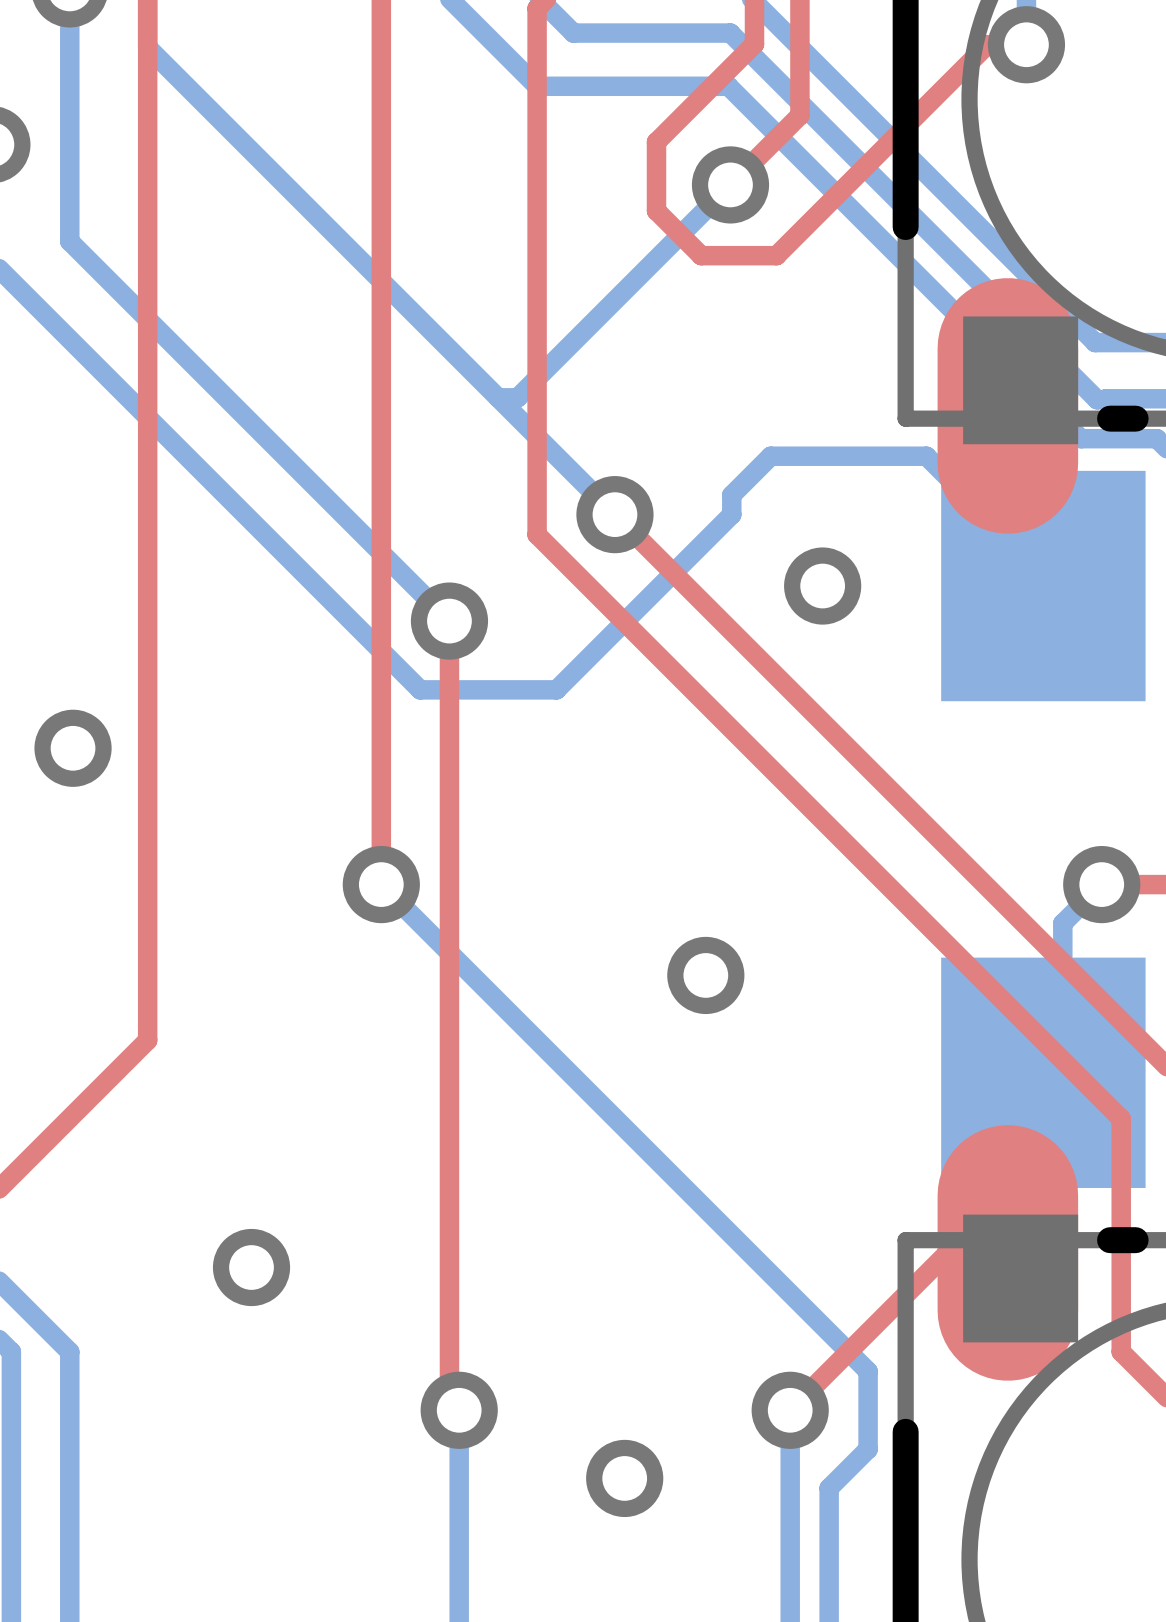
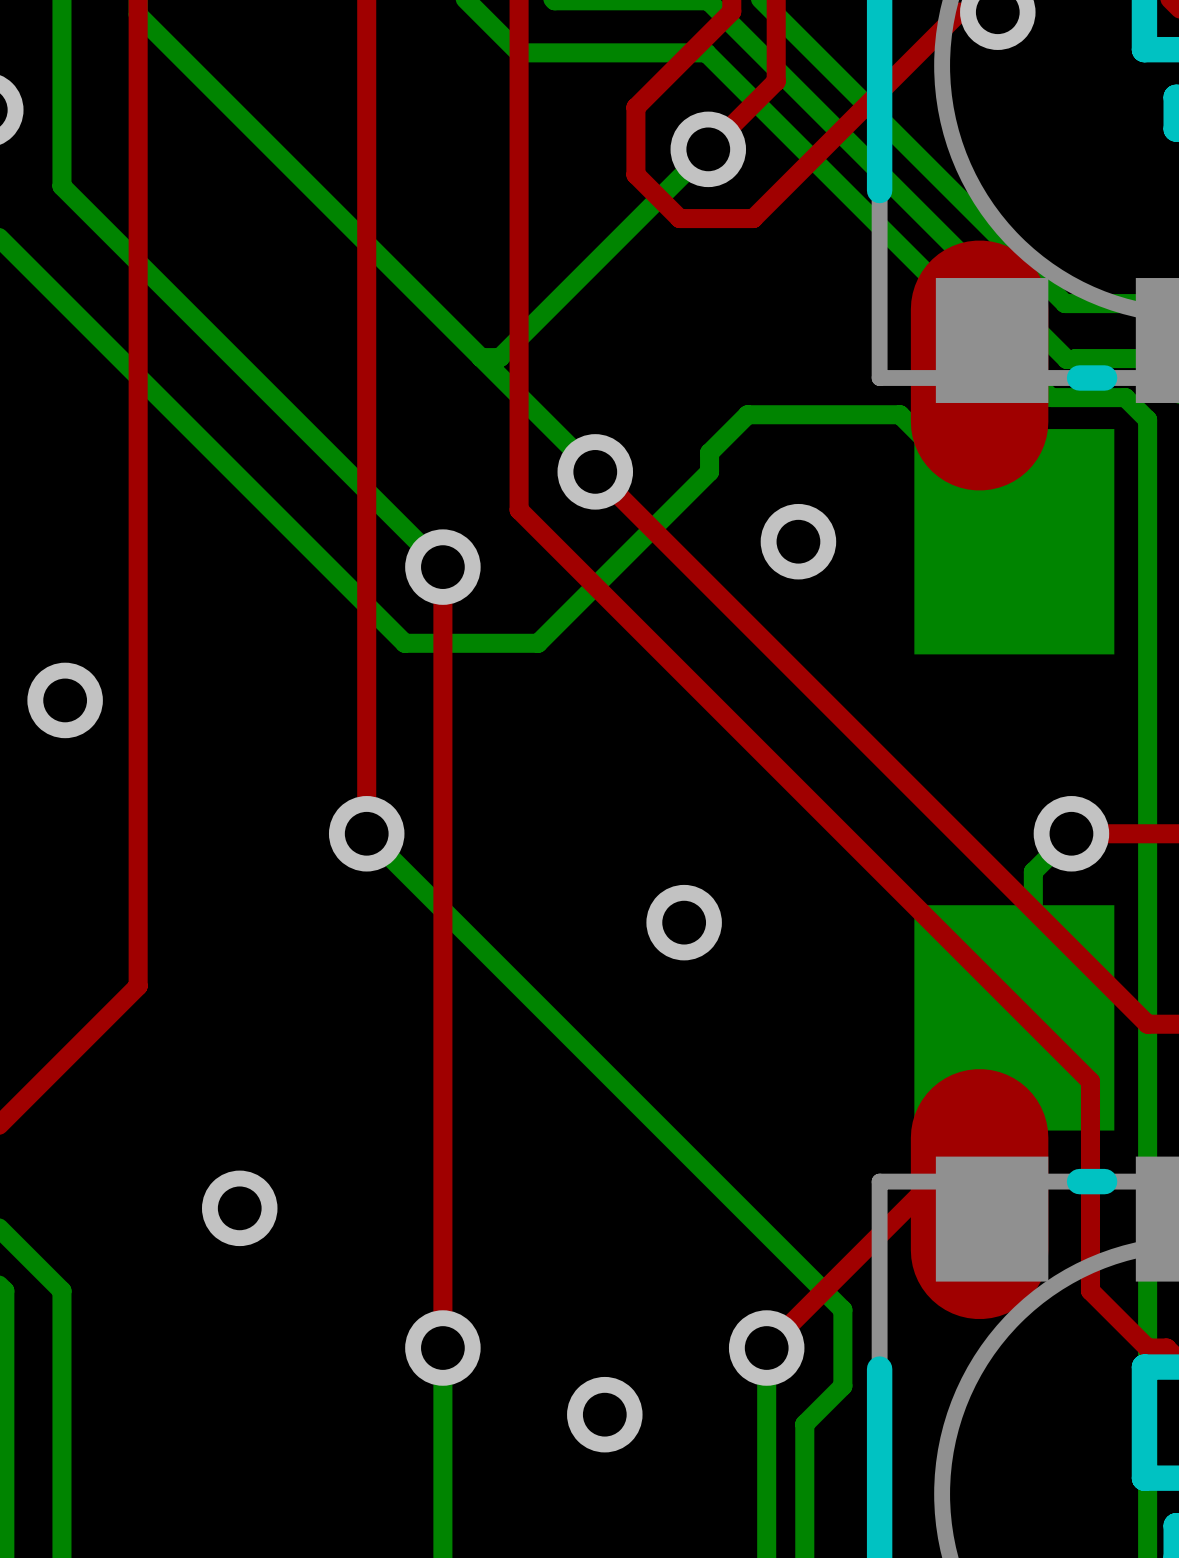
bottom track: (69, 222) (69, 241) (449, 621) -> (61, 186) (442, 567)
top track: (537, 534) (1121, 1118) (1121, 1137) -> (519, 491) (519, 509) (1090, 1081)
top track: (449, 621) (449, 1400) (459, 1410) -> (442, 567) (442, 1348)
via position: (449, 621) -> (442, 567)

